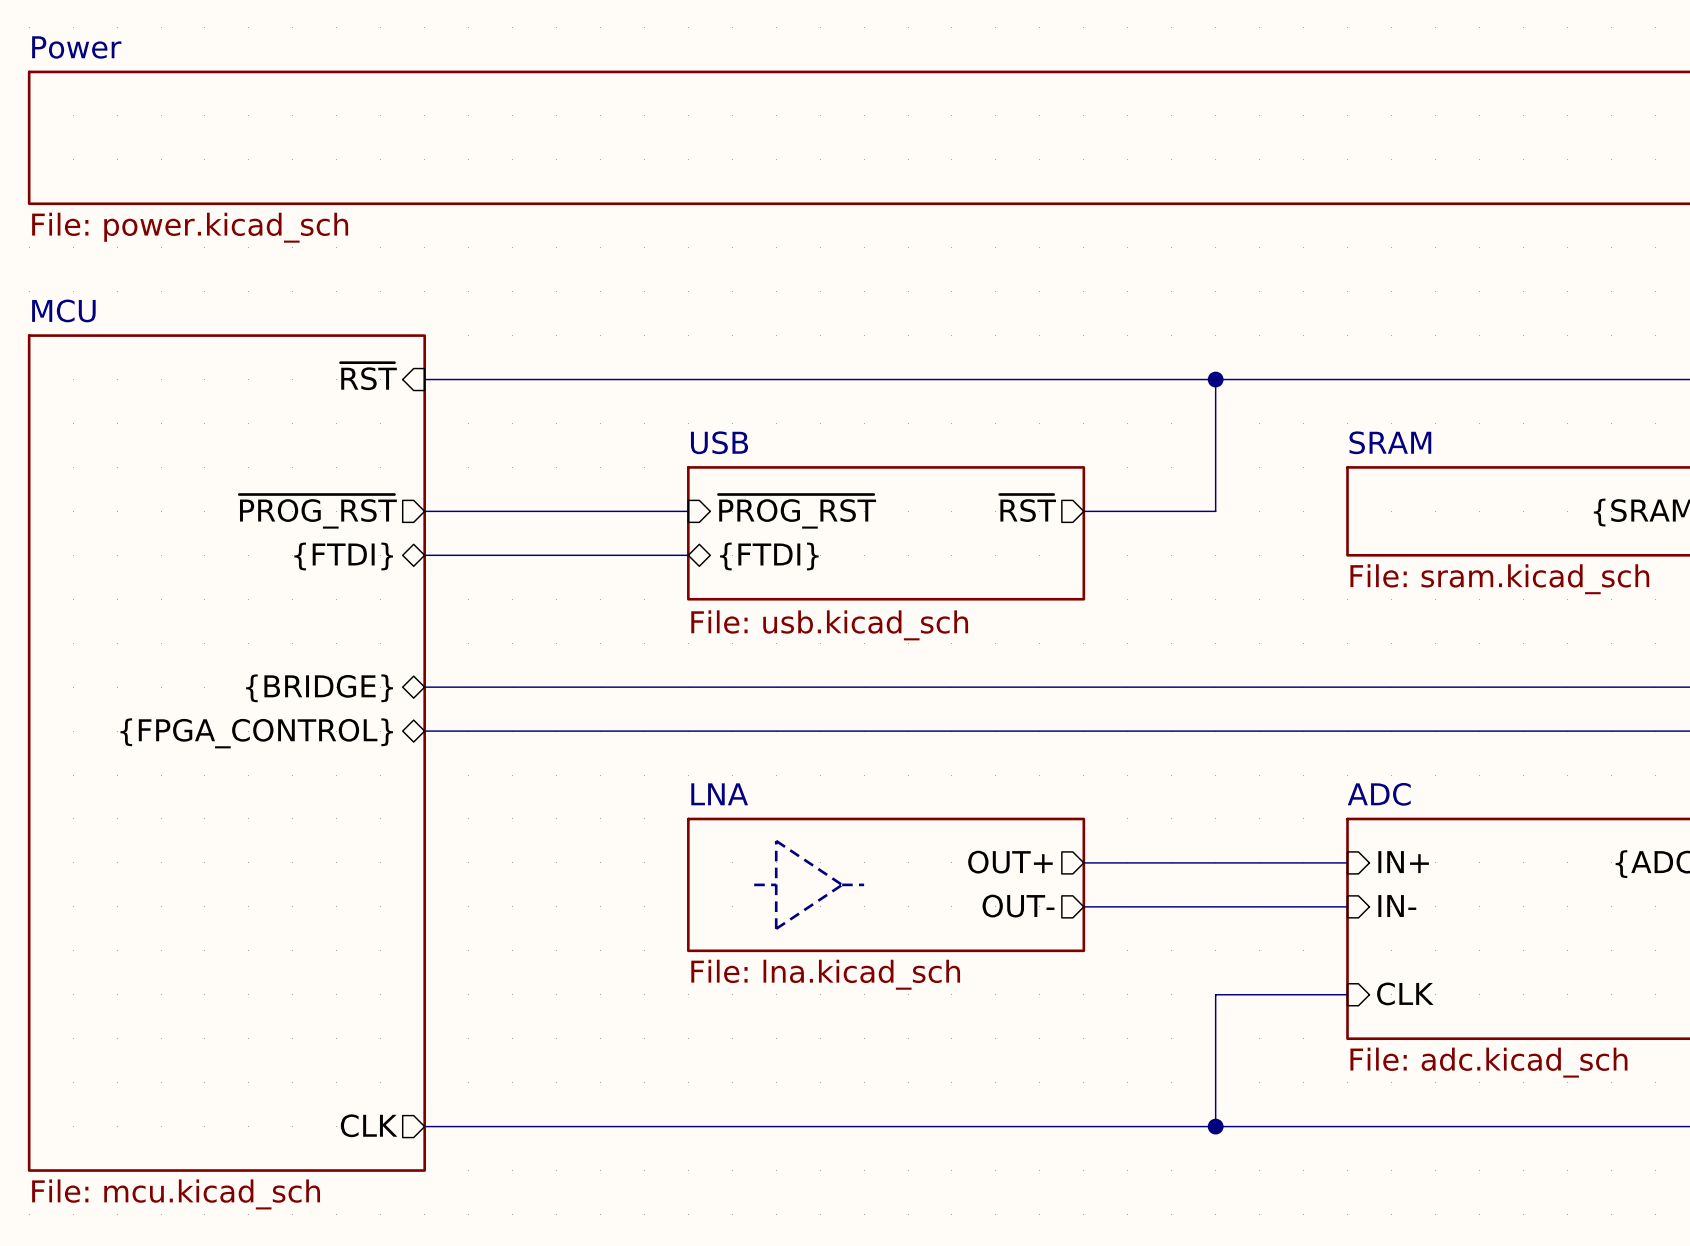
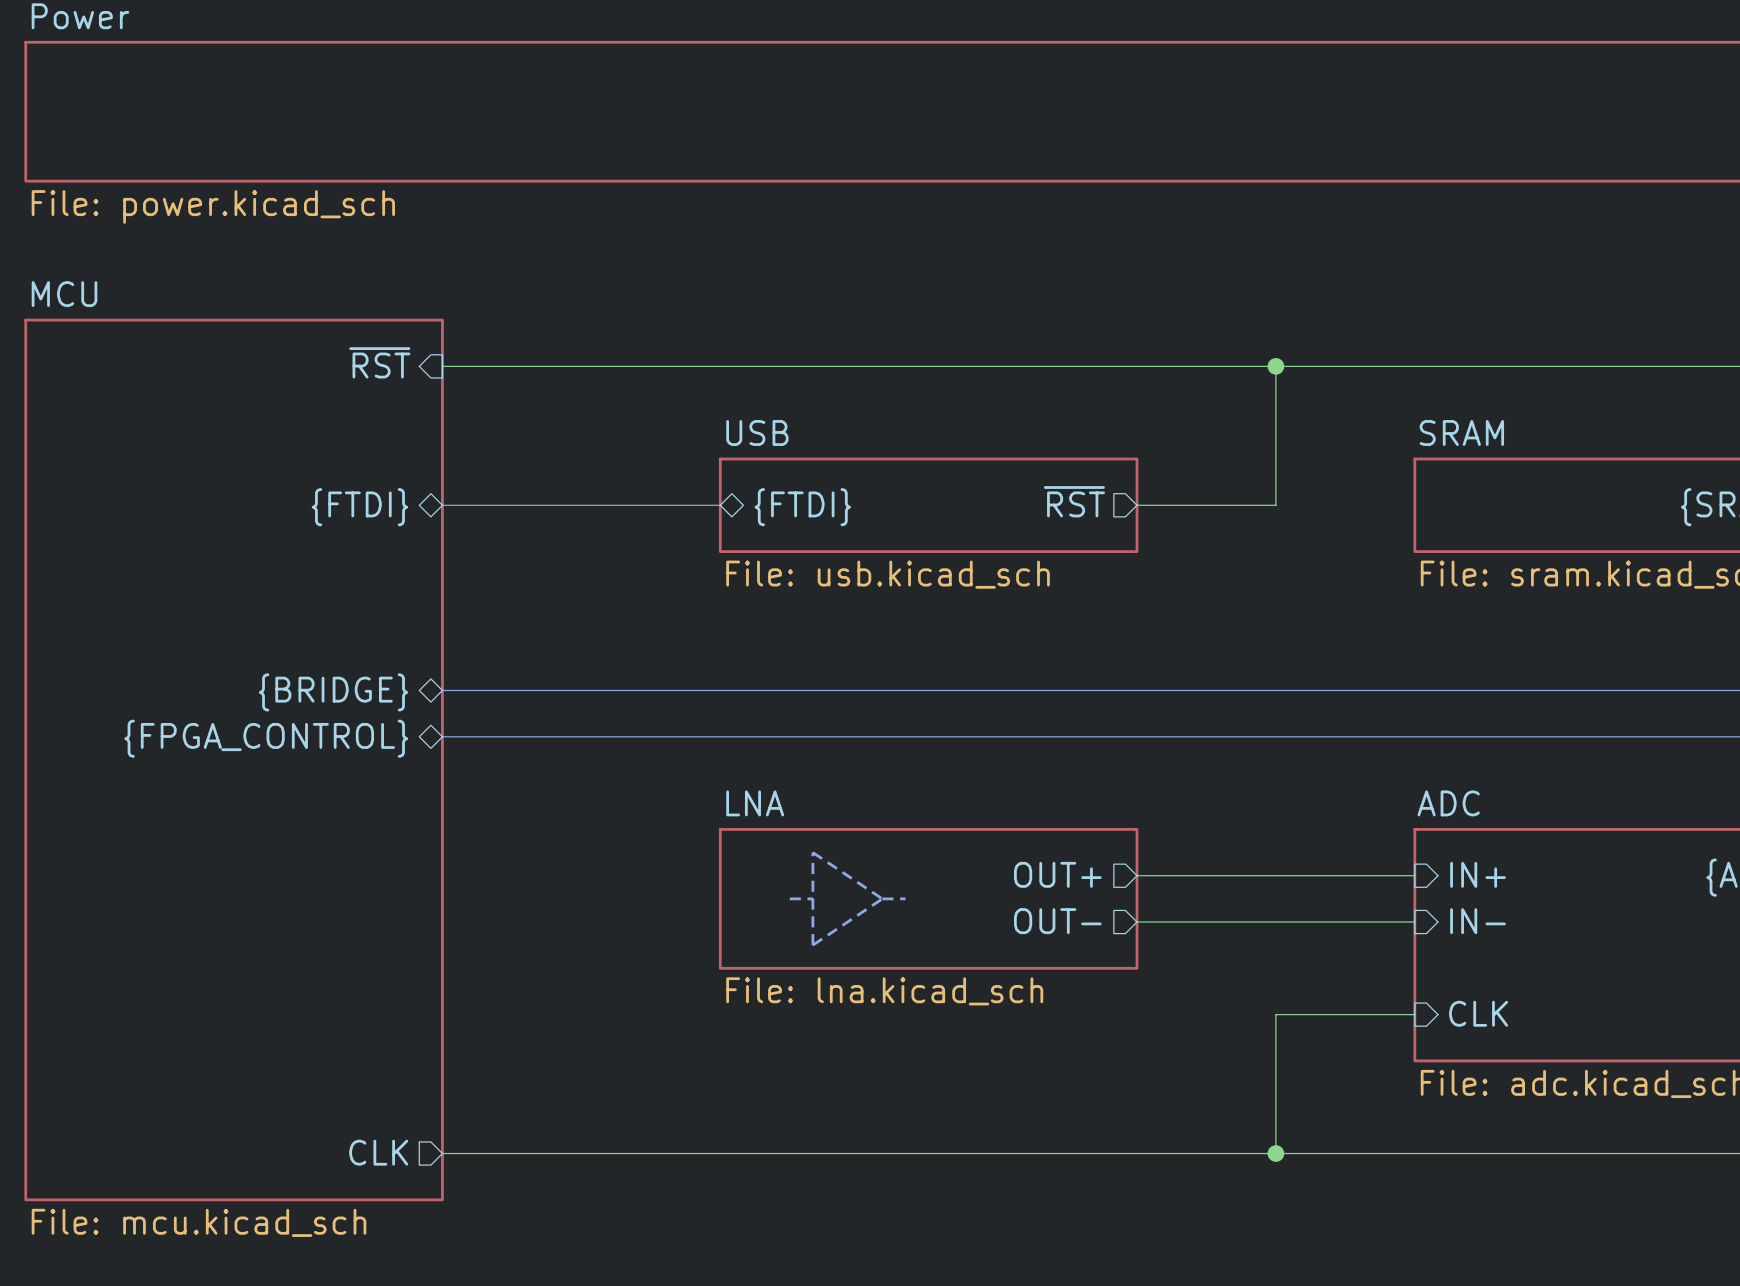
sheet pin shape: output (318, 511) -> bidirectional (359, 507)
sheet pin: ~{PROG_RST} (318, 511) -> {FTDI} (359, 507)
sheet pin shape: input (797, 511) -> bidirectional (802, 507)
sheet pin: ~{PROG_RST} (797, 511) -> {FTDI} (802, 507)
sheet USB: none -> File: usb.kicad_sch (928, 505)
sheet USB: File: usb.kicad_sch (886, 533) -> none
bus: (424, 555) (688, 555) -> (442, 505) (720, 505)
sheet pin: {FTDI} (343, 556) -> none
sheet pin: {FTDI} (769, 556) -> none

